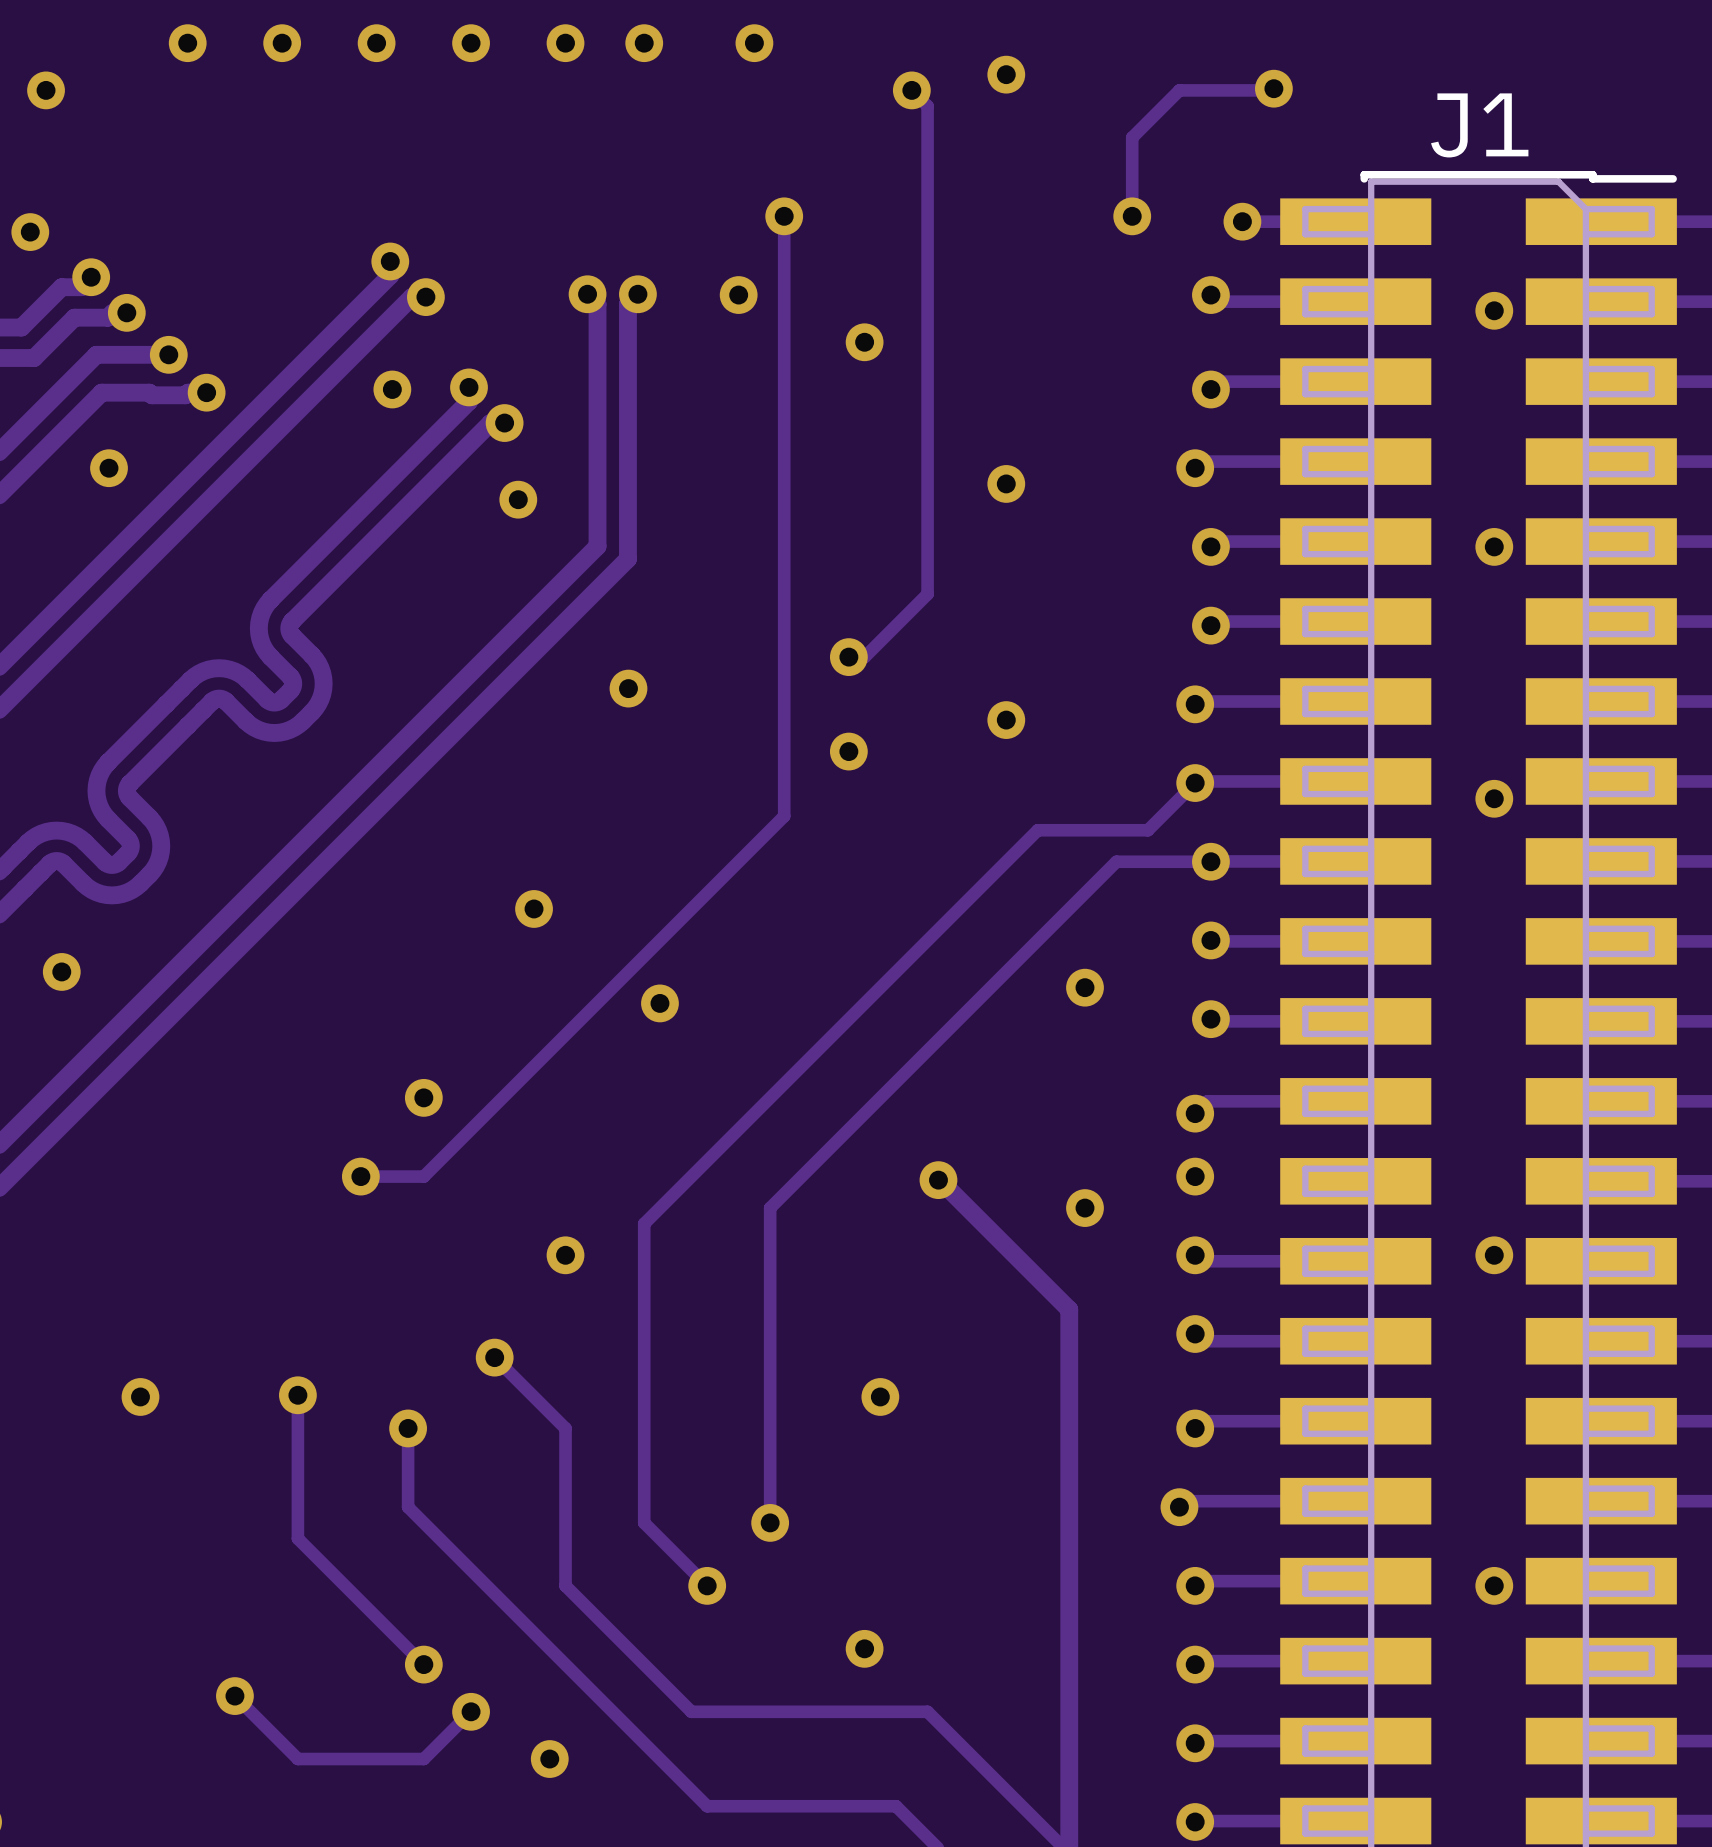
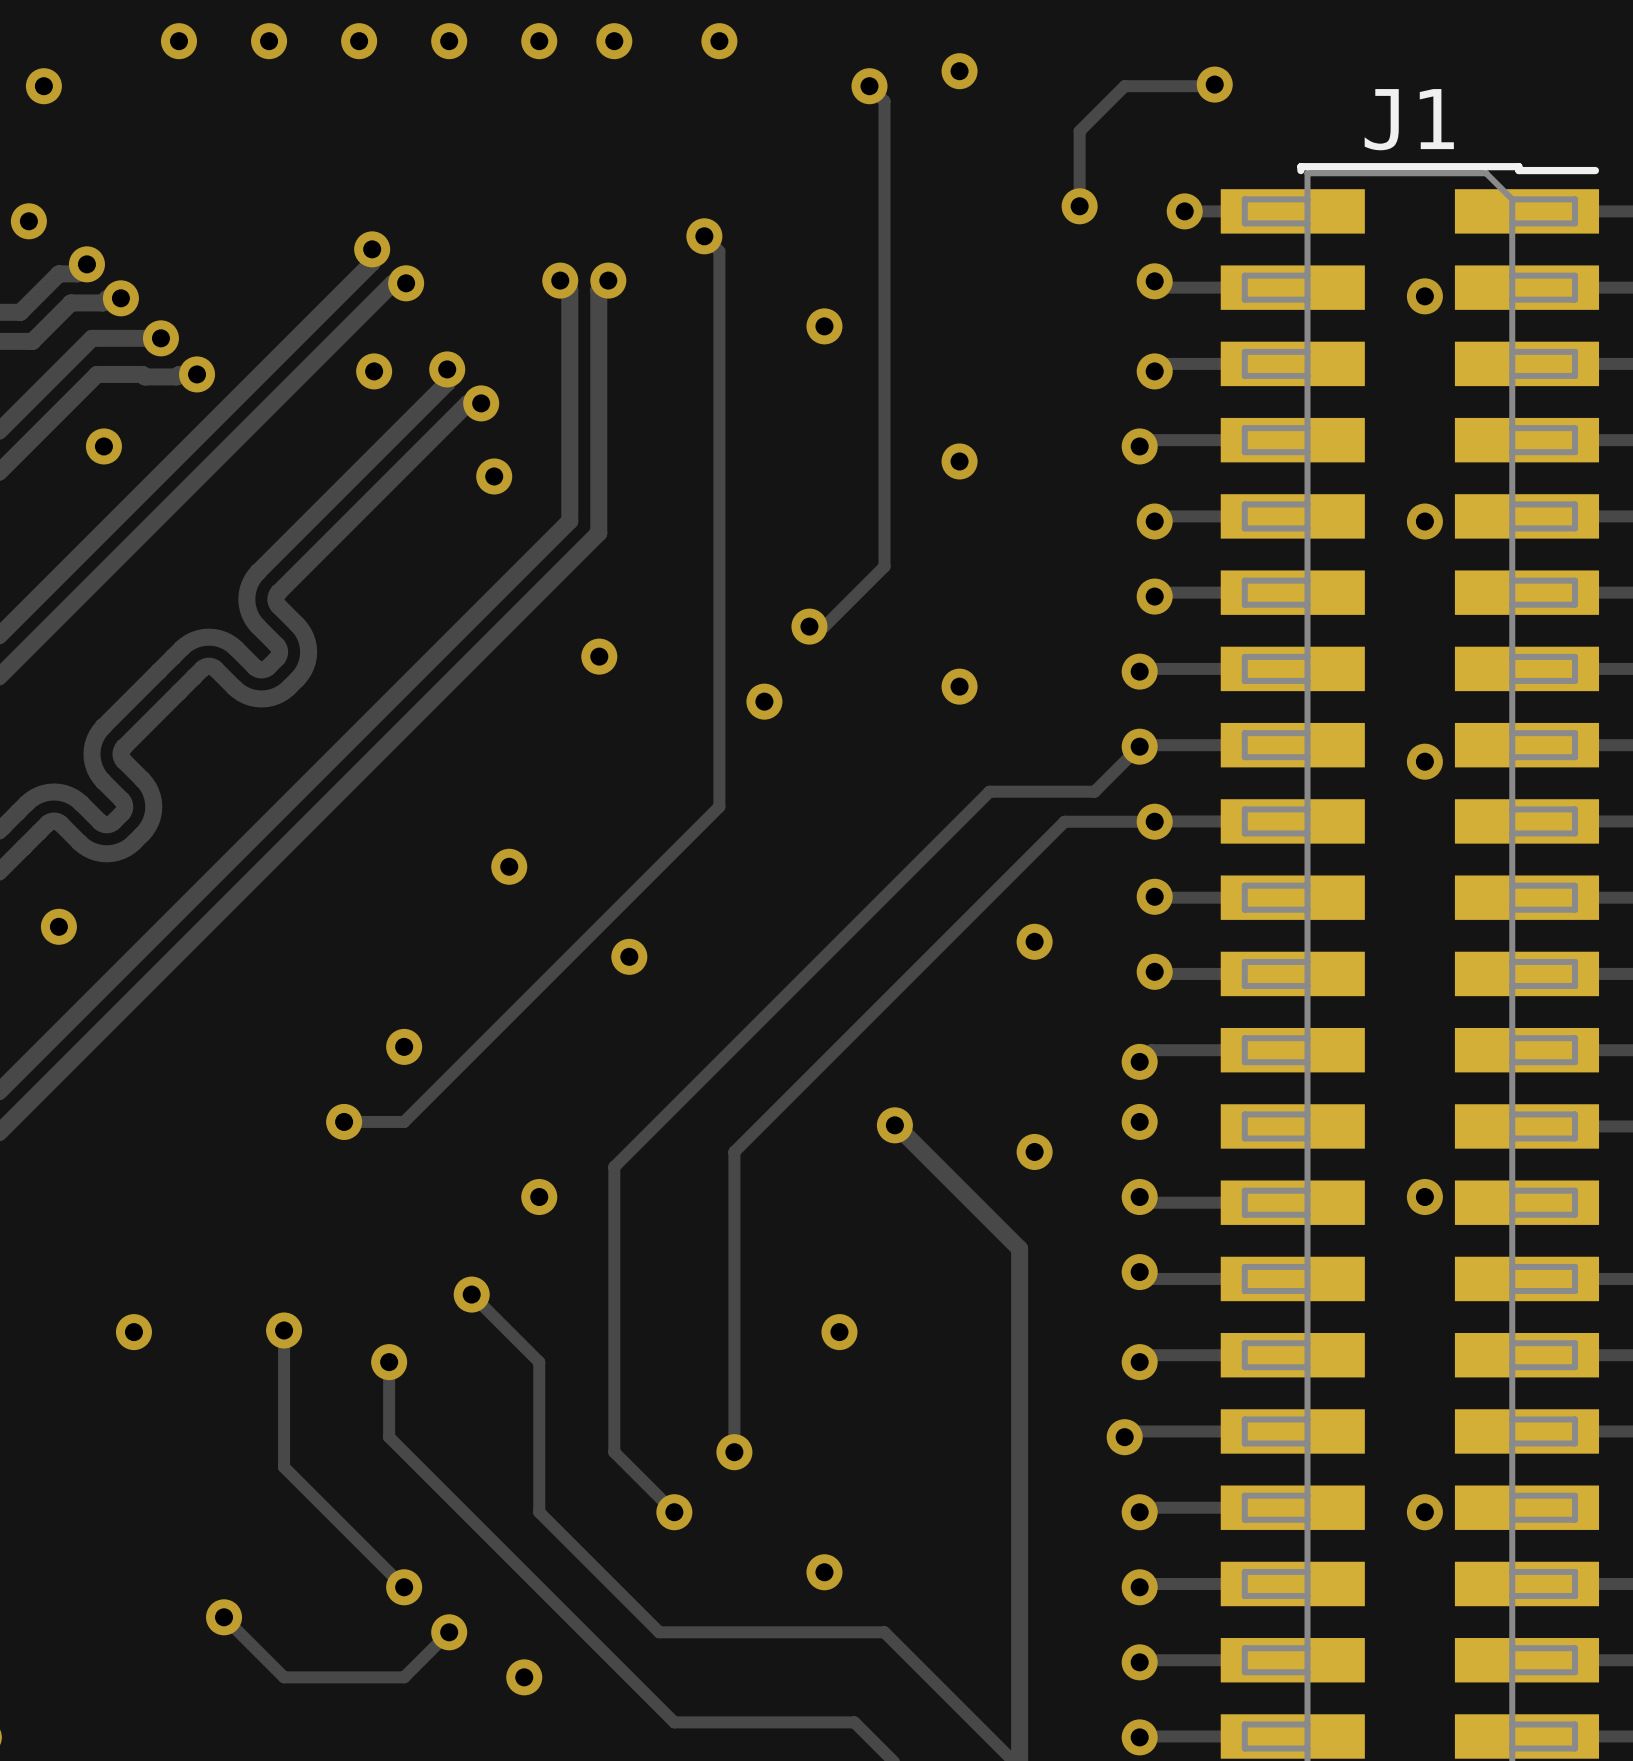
track: (784, 216) (784, 816) (754, 846) -> (704, 236) (719, 251) (719, 806)
via: (784, 216) -> none
via: none -> (704, 236)
via: (738, 295) -> none
via position: (848, 751) -> (764, 701)

